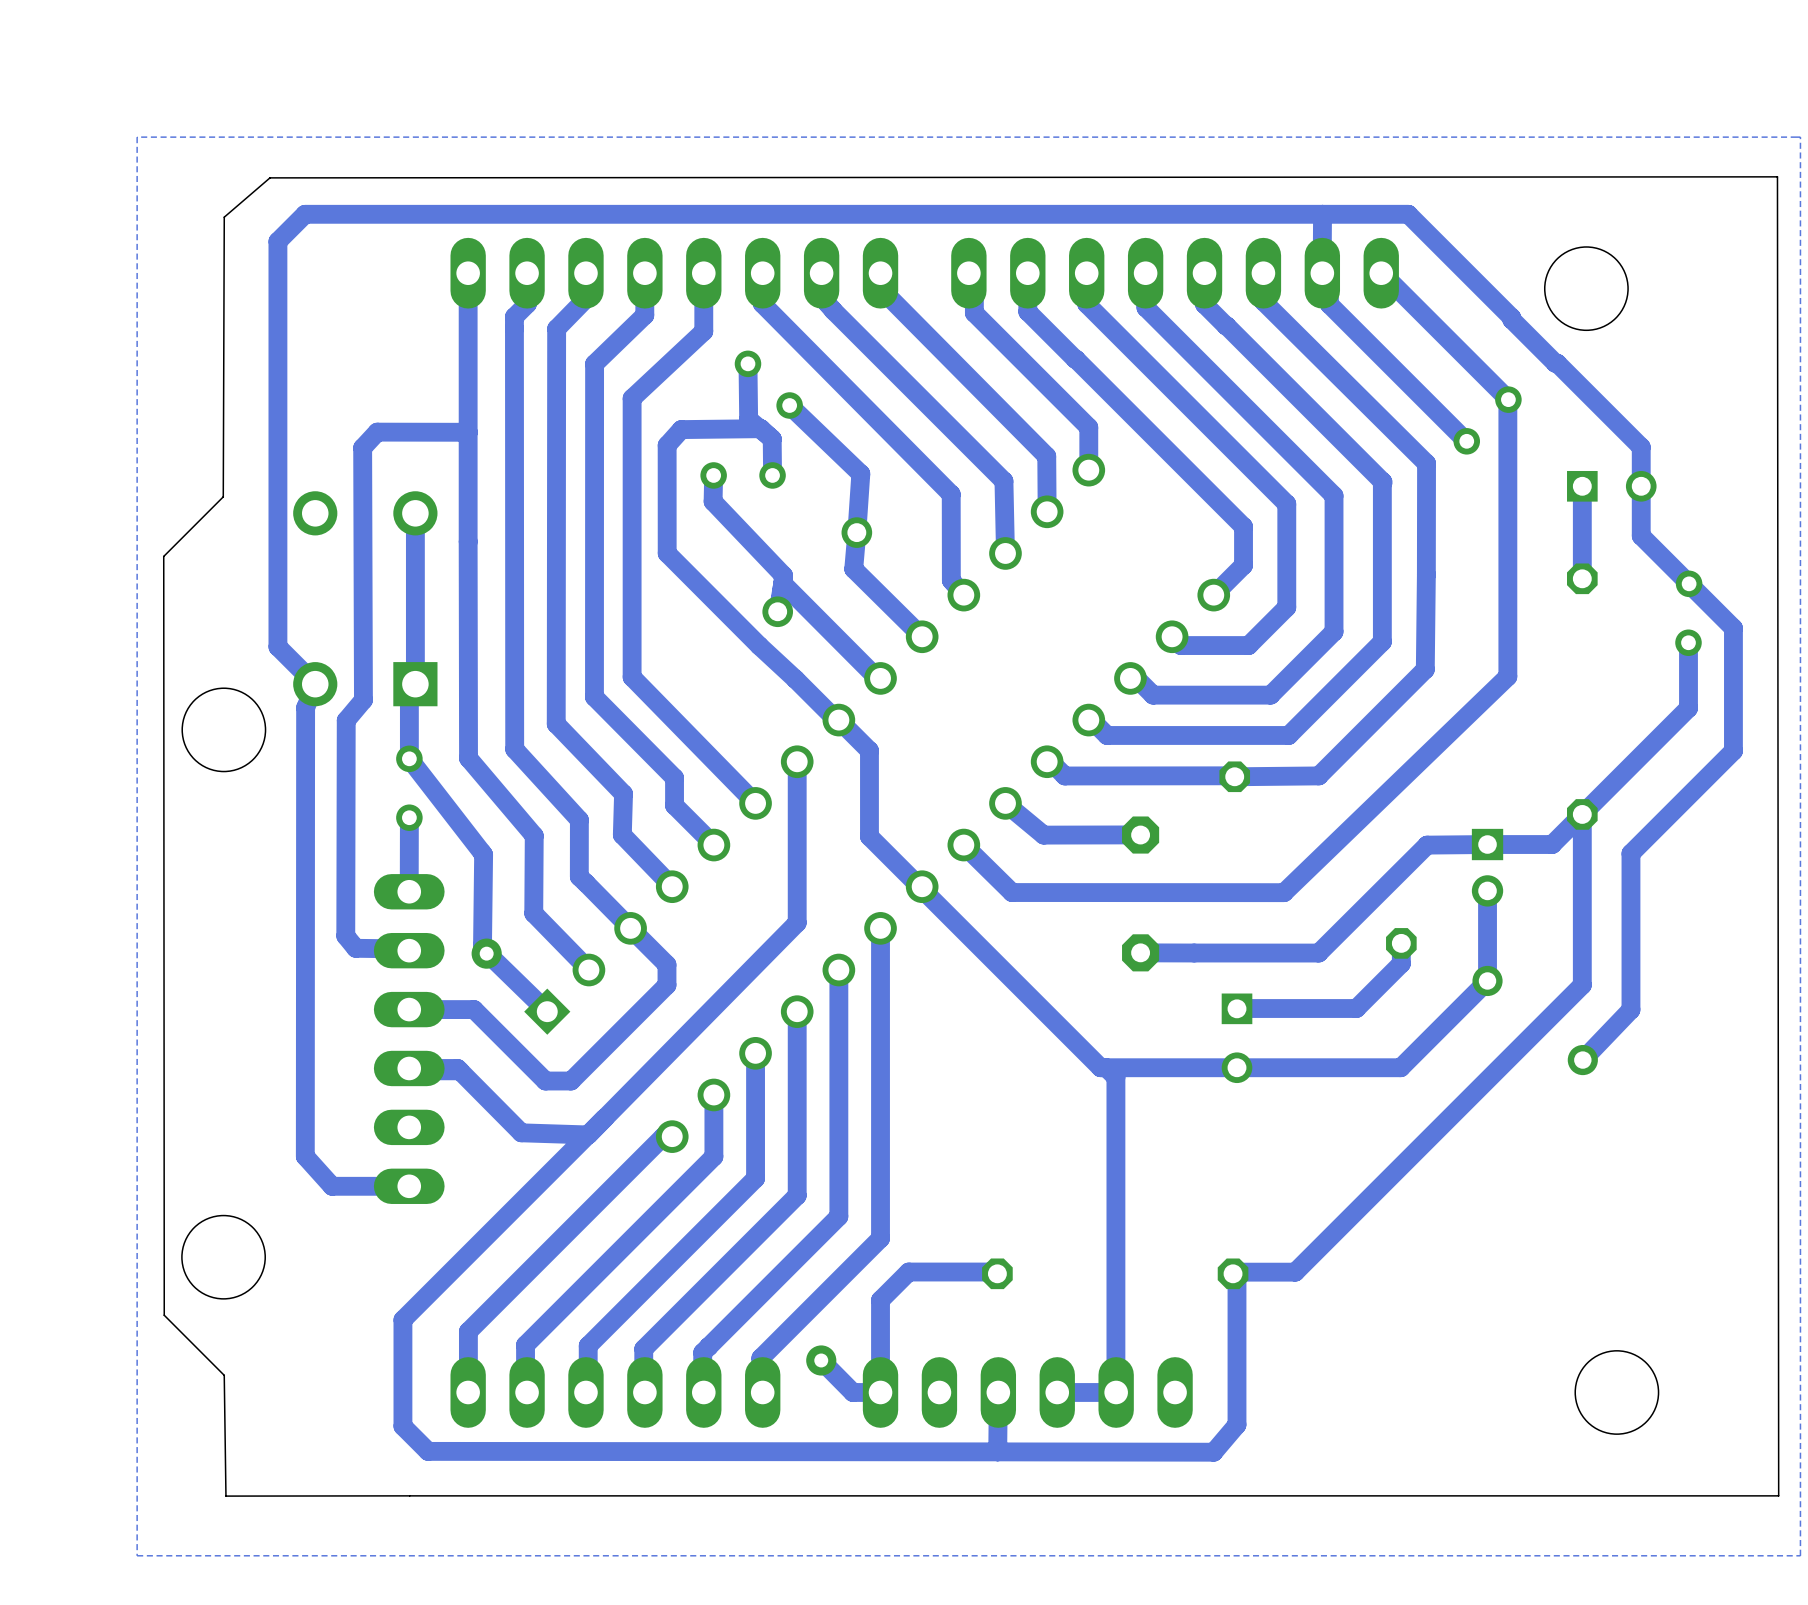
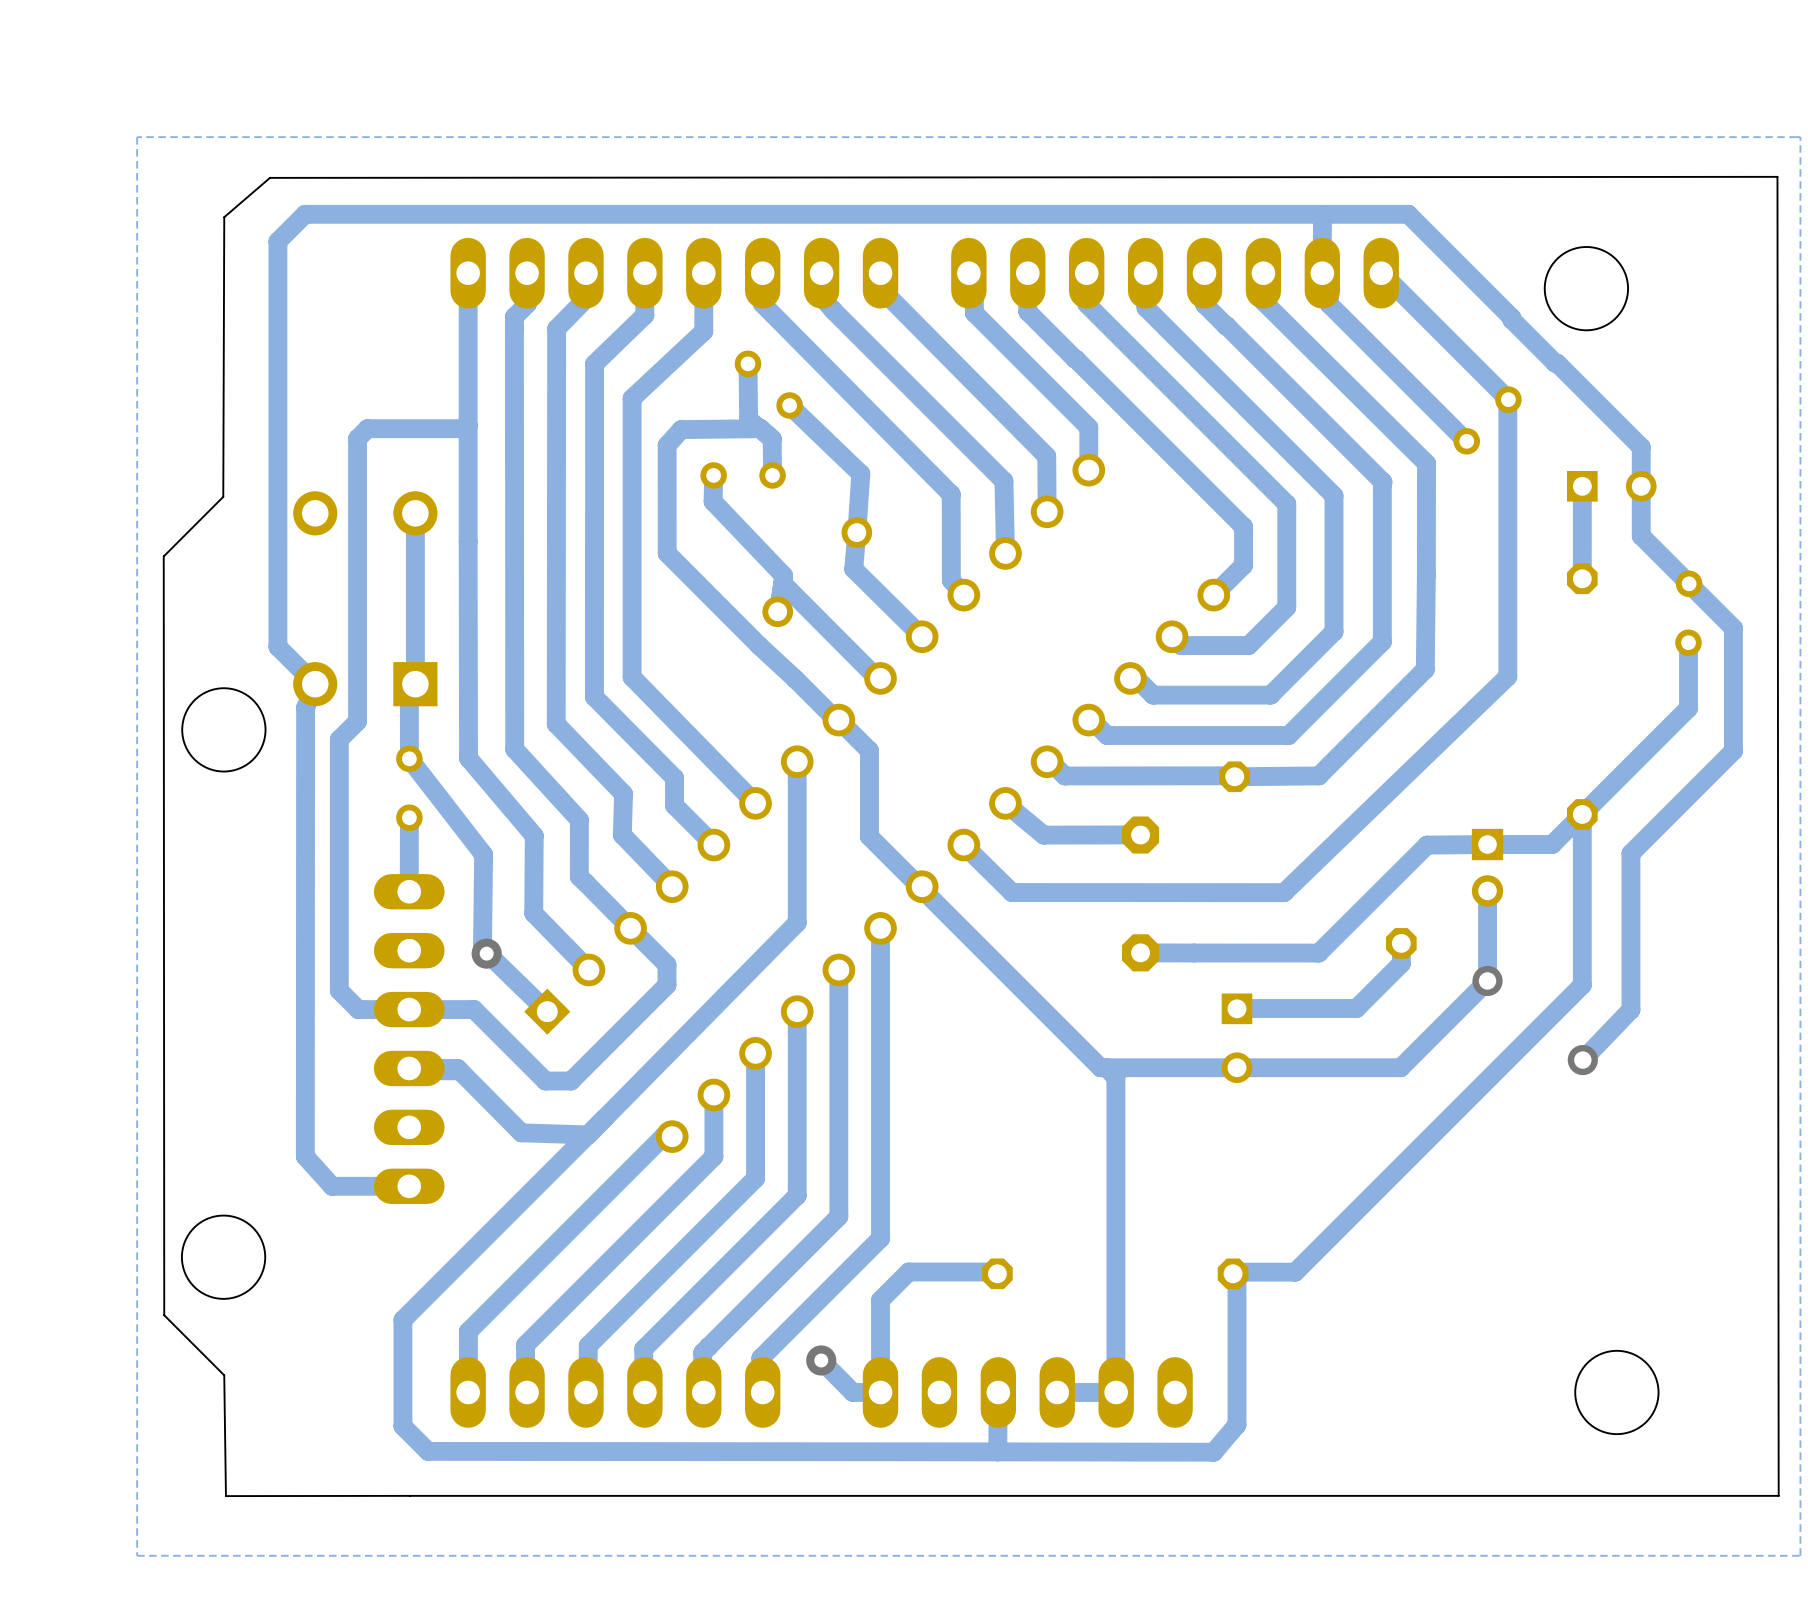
track: none -> (468, 425) (465, 428) (367, 428) (357, 438) (357, 721) (339, 739) (339, 990) (358, 1009) (409, 1009)
track: (468, 432) (377, 432) (362, 447) (363, 700) (346, 720) (345, 936) (355, 948) (407, 948) (409, 950) -> none

